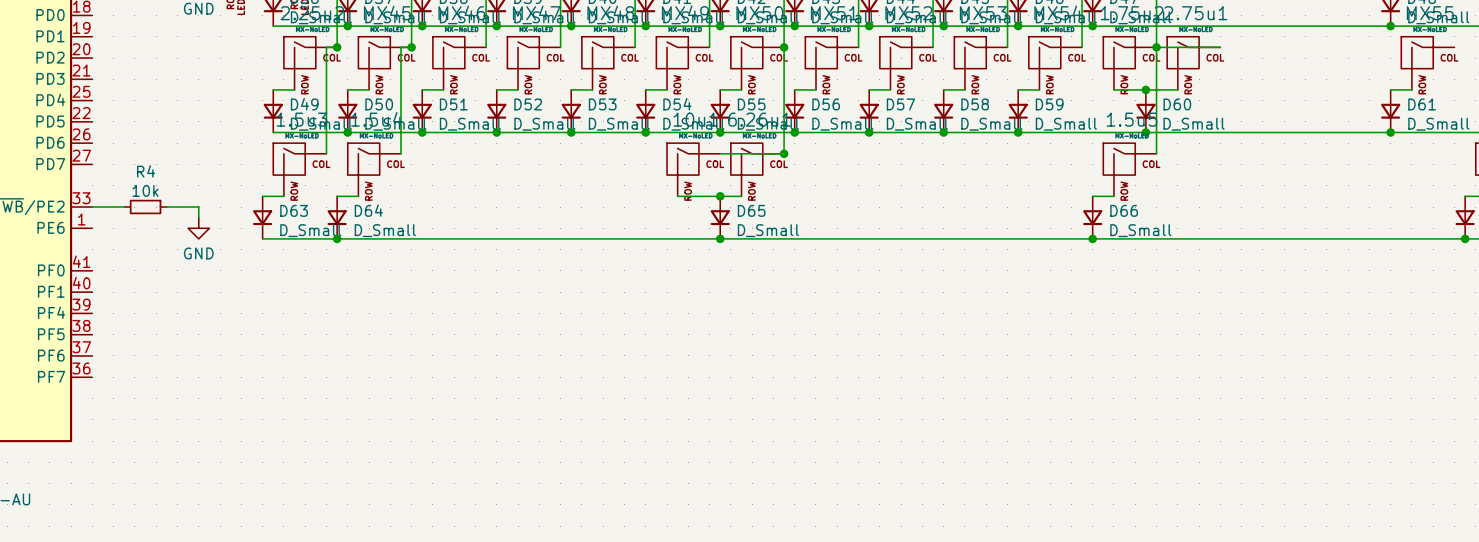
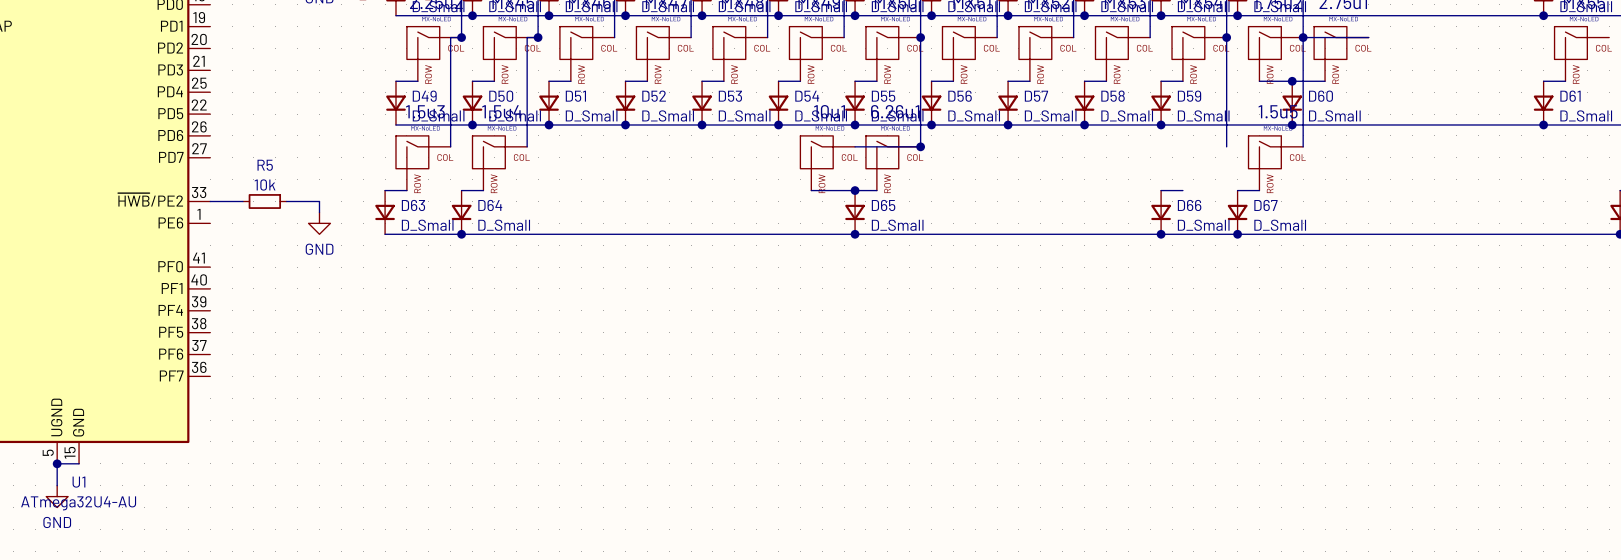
wire: none -> (1226, 37) (1226, 146)
junction: none -> (1226, 37)
R4 name: R4 (146, 171) -> R5 (265, 165)
wire: none -> (1161, 190) (1182, 190)
D66 name: D66 (1124, 210) -> D67 (1265, 205)
D66: none -> D_Small (1161, 212)
junction: none -> (1161, 234)

